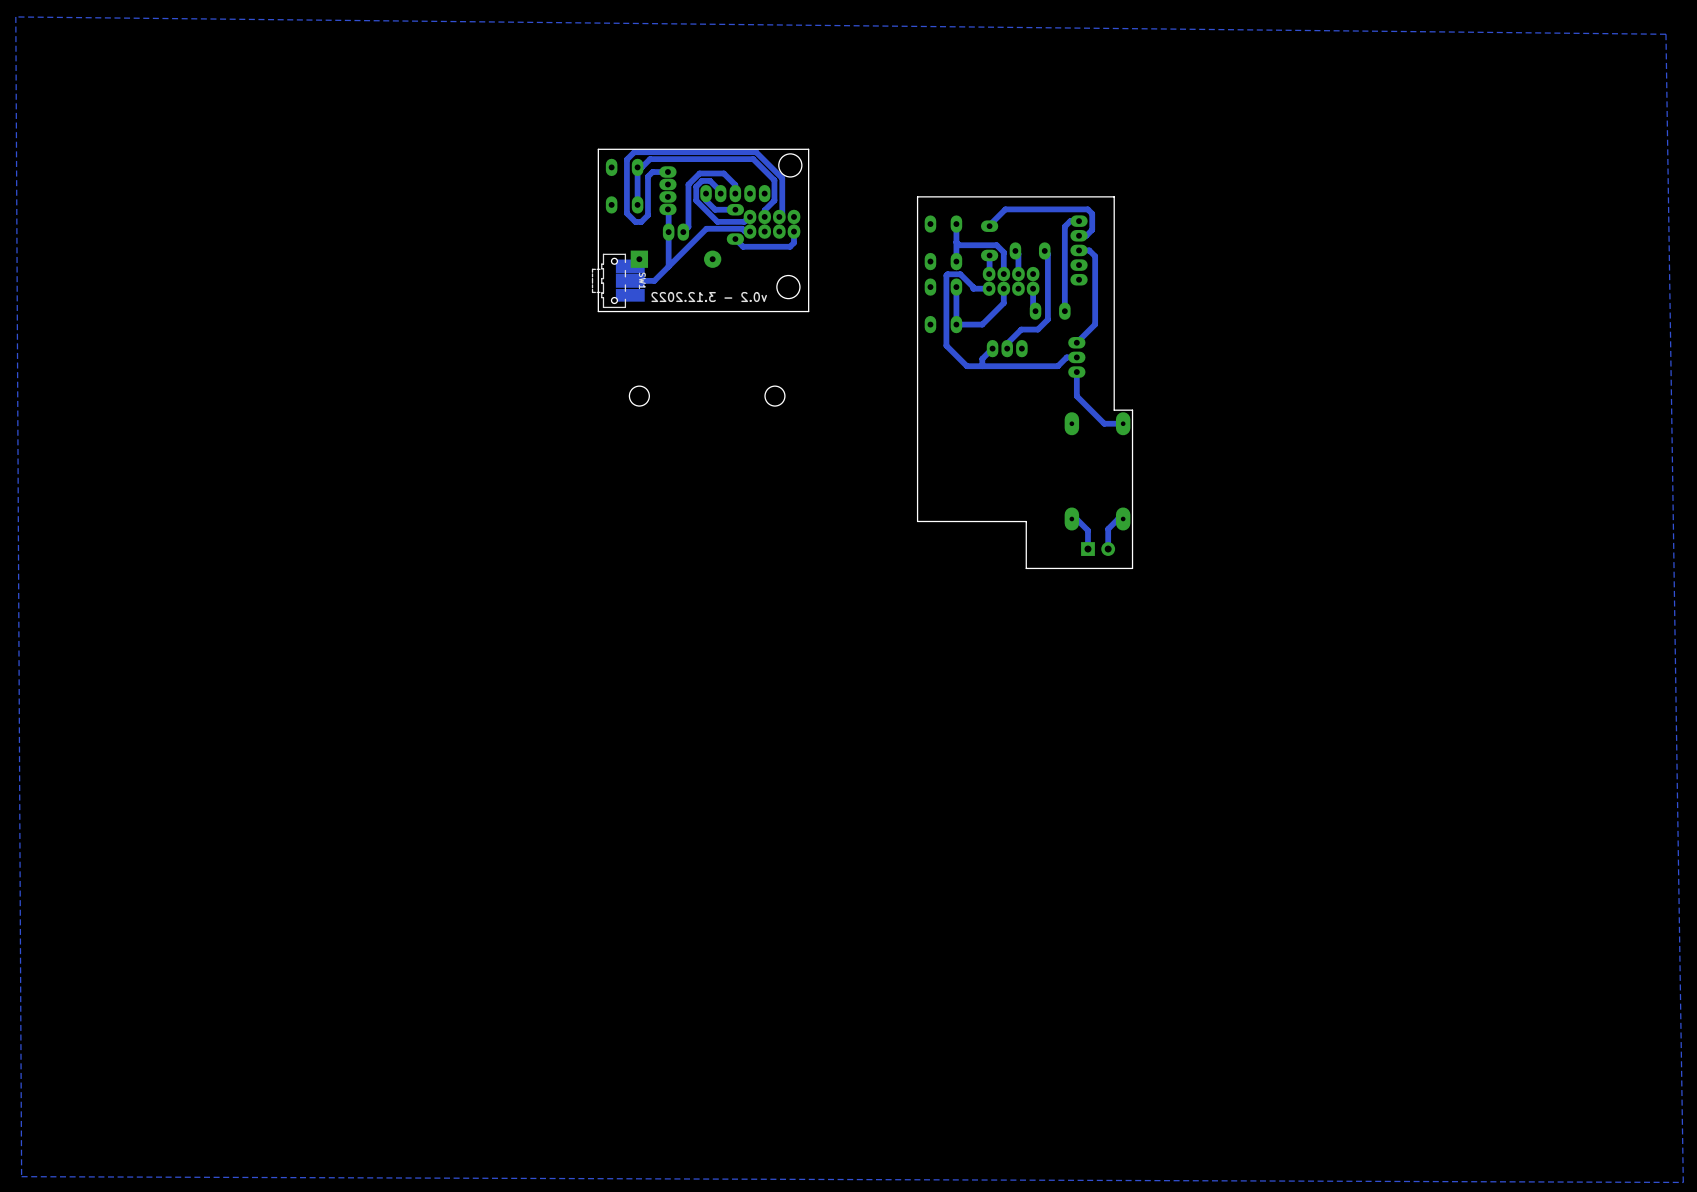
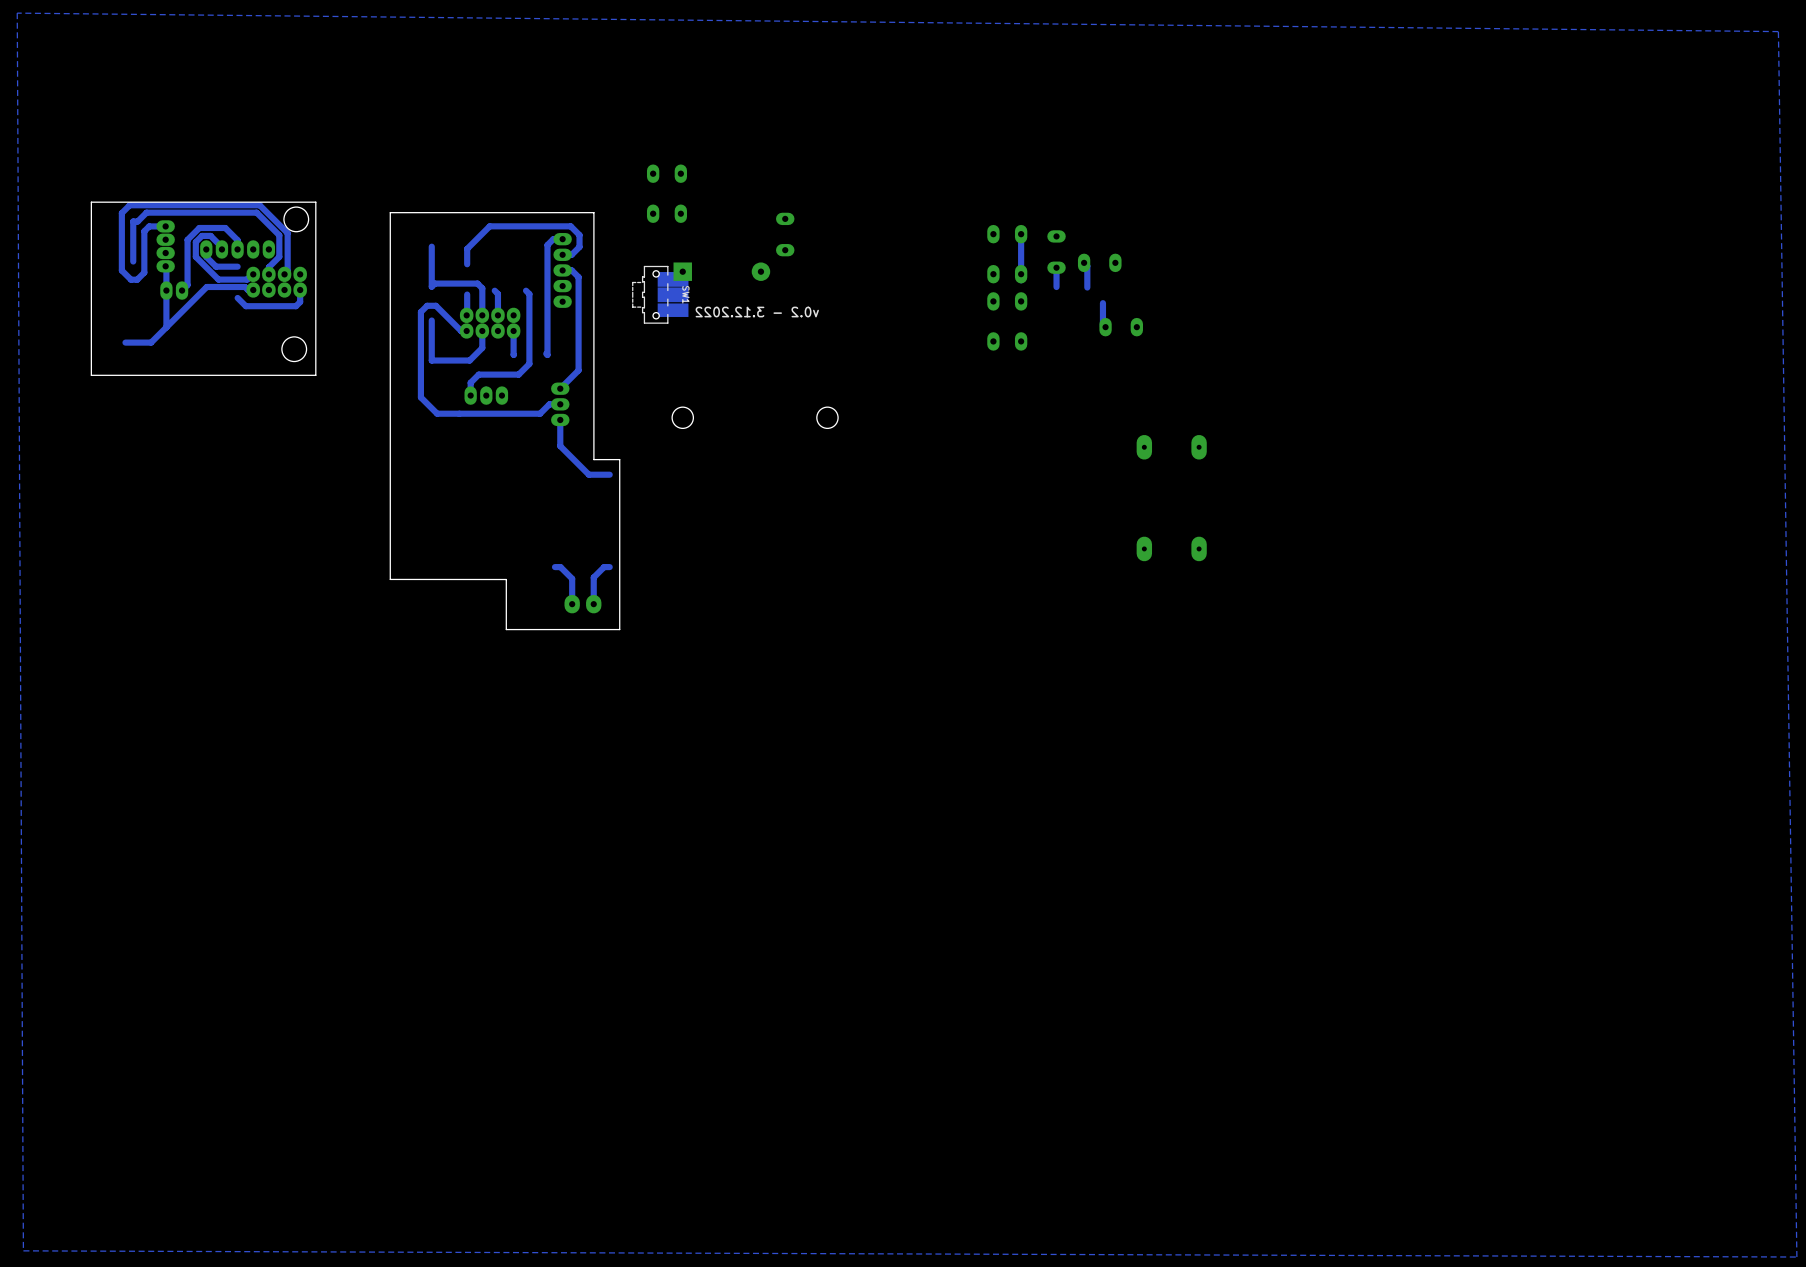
board edge: (808, 149) (598, 149) (598, 311) (808, 311) (808, 149) -> none
round board edge: [778, 153, 803, 178] -> none
bottom track: (667, 172) (652, 172) (647, 176) (647, 215) (641, 221) (635, 221) (626, 213) (626, 159) (634, 152) (756, 152) (782, 178) (782, 214) (779, 216) -> none
part: (667, 190) -> none
bottom track: (706, 193) (706, 200) (715, 209) (735, 209) -> none
bottom track: (720, 193) (710, 180) (701, 180) (696, 186) (696, 200) (717, 221) (744, 221) (750, 216) (747, 219) -> none
bottom track: (735, 193) (735, 184) (723, 173) (699, 173) (688, 184) (688, 226) (683, 232) -> none
part: (735, 193) -> none
board edge: none -> (315, 202) (91, 202) (91, 375) (315, 375) (315, 202)
board edge: (1114, 196) (1114, 410) (1132, 410) (1132, 568) (1026, 568) (1026, 521) (917, 521) (917, 196) (1114, 196) -> none
round board edge: none -> [283, 206, 309, 233]
board edge: none -> (593, 212) (593, 459) (619, 459) (619, 629) (506, 629) (506, 579) (390, 579) (390, 212) (593, 212)
bottom track: (637, 204) (637, 167) (641, 167) (650, 159) (753, 159) (774, 180) (774, 200) (764, 210) (764, 216) -> none
bottom track: (667, 209) (668, 266) -> none
bottom track: none -> (165, 226) (149, 226) (144, 231) (144, 272) (137, 279) (131, 279) (121, 270) (121, 213) (129, 205) (259, 205) (287, 233) (287, 271) (284, 274)
bottom track: (1079, 221) (1070, 221) (1064, 226) (1064, 311) (1063, 310) -> none
part: (772, 224) -> none
bottom track: (989, 225) (1005, 209) (1087, 209) (1092, 213) (1092, 229) (1086, 235) (1079, 235) -> none
bottom track: none -> (562, 239) (553, 239) (547, 245) (547, 354) (546, 353)
bottom track: (750, 231) (745, 231) (742, 228) (706, 228) (654, 280) (630, 280) -> none
bottom track: (793, 231) (793, 242) (790, 246) (743, 246) (735, 239) -> none
part: (675, 232) -> none
part: none -> (165, 246)
bottom track: none -> (431, 246) (431, 286) (434, 283) (477, 283) (482, 288) (482, 315)
bottom track: none -> (206, 249) (206, 256) (216, 266) (237, 266)
bottom track: none -> (221, 249) (210, 235) (201, 235) (195, 242) (195, 256) (218, 279) (247, 279) (253, 274) (250, 276)
bottom track: none -> (237, 249) (237, 240) (225, 227) (199, 227) (187, 239) (187, 285) (182, 290)
part: none -> (237, 249)
bottom track: (956, 242) (959, 245) (996, 245) (1004, 252) (1003, 274) -> none
bottom track: none -> (562, 254) (571, 254) (579, 246) (579, 235) (570, 226) (489, 226) (467, 248) (467, 264)
bottom track: none -> (133, 261) (133, 221) (137, 221) (146, 212) (256, 212) (279, 235) (279, 256) (268, 267) (268, 274)
bottom track: (1044, 250) (1047, 254) (1047, 319) (1037, 329) (1021, 329) (1007, 343) (1007, 348) -> none
bottom track: (1079, 250) (1089, 250) (1095, 256) (1095, 324) (1076, 342) -> none
part: (1079, 250) -> none
bottom track: none -> (165, 266) (166, 327)
bottom track: none -> (562, 270) (571, 270) (578, 277) (578, 370) (560, 388)
part: none -> (562, 270)
part: none -> (276, 282)
round board edge: [776, 275, 801, 299] -> none
part: none -> (174, 290)
bottom track: none -> (253, 290) (248, 290) (244, 286) (206, 286) (151, 342) (125, 342)
bottom track: none -> (300, 290) (300, 302) (295, 306) (245, 306) (237, 297)
bottom track: none -> (494, 290) (497, 293) (497, 315)
bottom track: none -> (526, 290) (529, 294) (529, 363) (518, 374) (478, 374) (470, 382) (470, 395)
bottom track: none -> (467, 294) (467, 314)
part: (1011, 281) -> none
bottom track: (956, 287) (956, 324) (982, 324) (1003, 303) (1003, 288) -> none
bottom track: (989, 288) (973, 288) (960, 274) (946, 275) (946, 345) (966, 366) (1057, 366) (1066, 357) (1076, 357) -> none
bottom track: none -> (431, 320) (431, 360) (469, 360) (482, 347) (482, 331)
part: none -> (490, 323)
bottom track: none -> (466, 331) (461, 331) (435, 305) (427, 305) (420, 312) (420, 397) (437, 413) (540, 413) (549, 404) (560, 404)
bottom track: none -> (513, 331) (513, 354)
round board edge: none -> [281, 336, 307, 362]
bottom track: (992, 348) (982, 358) (982, 366) -> none
part: (1007, 348) -> none
part: (1076, 357) -> none
bottom track: (1076, 372) (1076, 396) (1104, 423) (1123, 423) -> none
part: none -> (486, 395)
part: none -> (560, 404)
bottom track: none -> (560, 419) (560, 446) (588, 474) (609, 474)
bottom track: (1071, 518) (1076, 518) (1087, 530) (1087, 549) -> none
bottom track: (1123, 518) (1118, 518) (1108, 529) (1108, 549) -> none
bottom track: none -> (554, 567) (560, 567) (572, 578) (572, 604)
bottom track: none -> (609, 567) (604, 567) (593, 577) (593, 604)
part: (1098, 549) -> none
part: none -> (582, 604)

